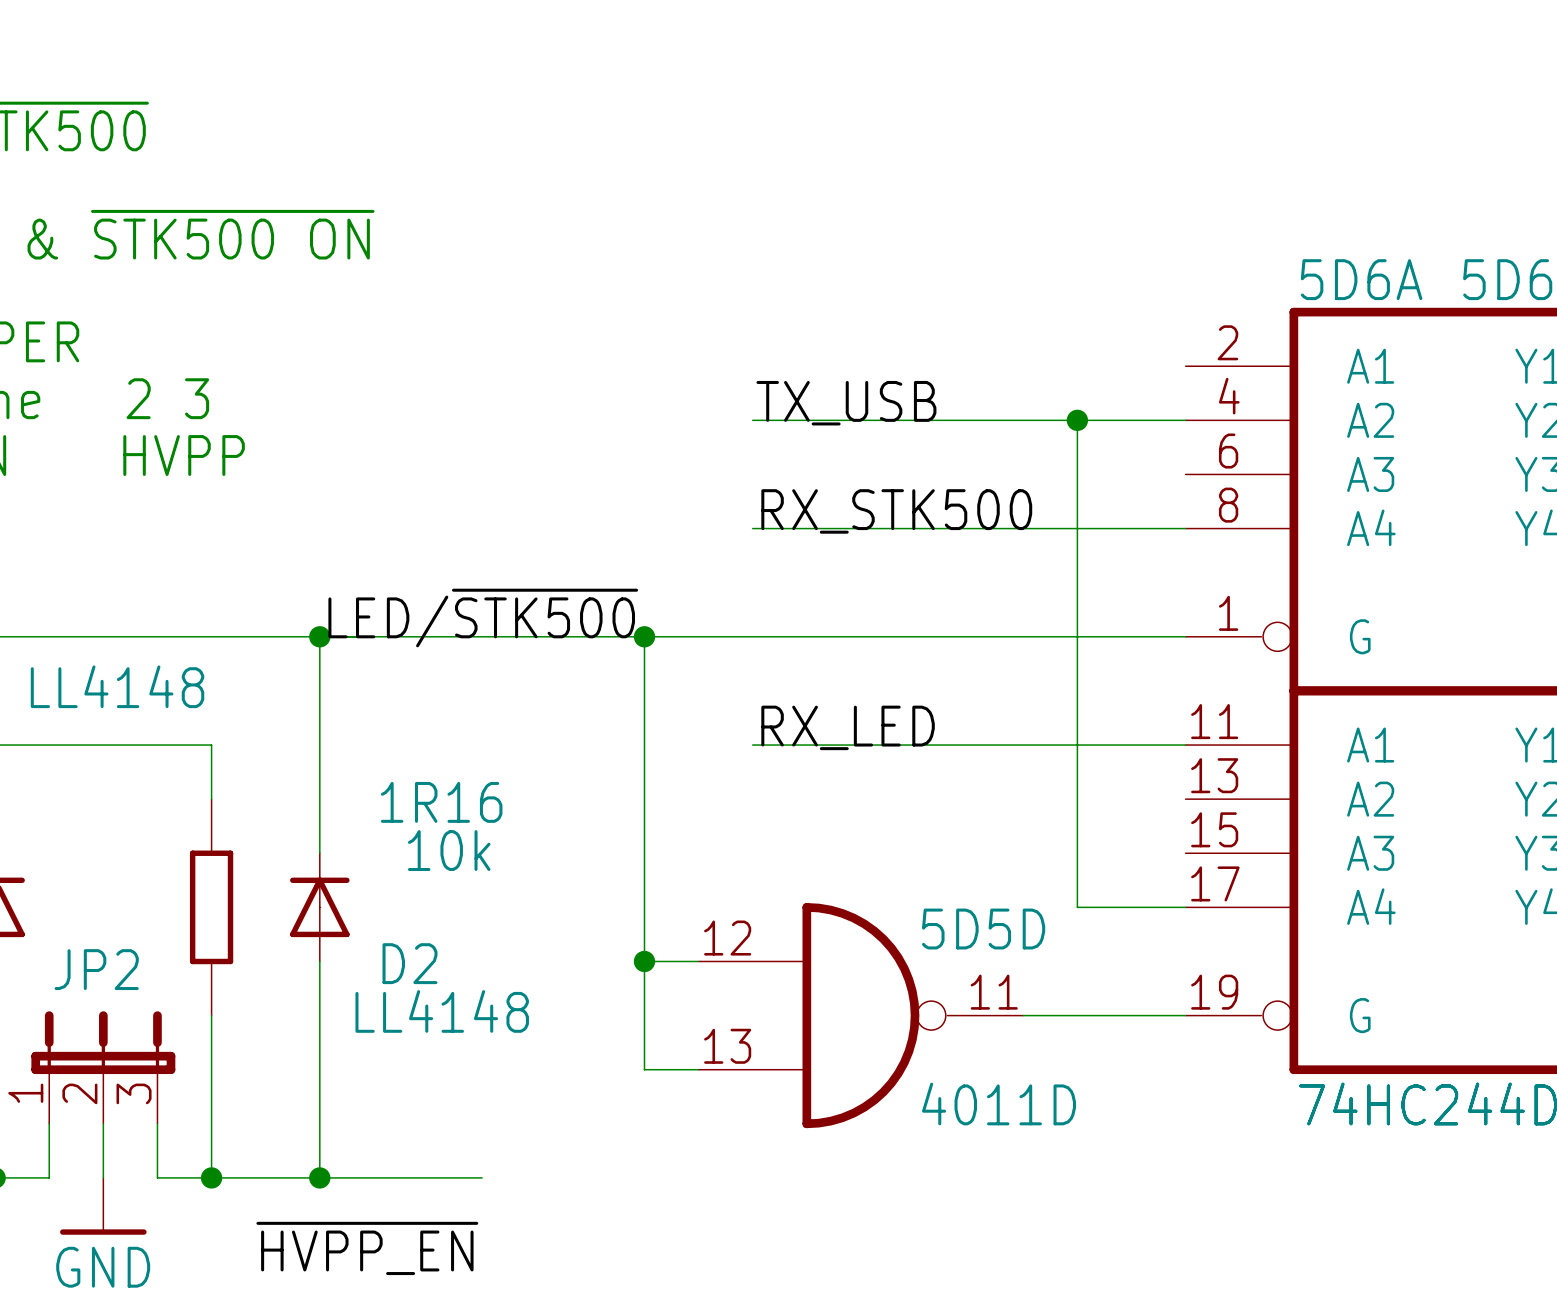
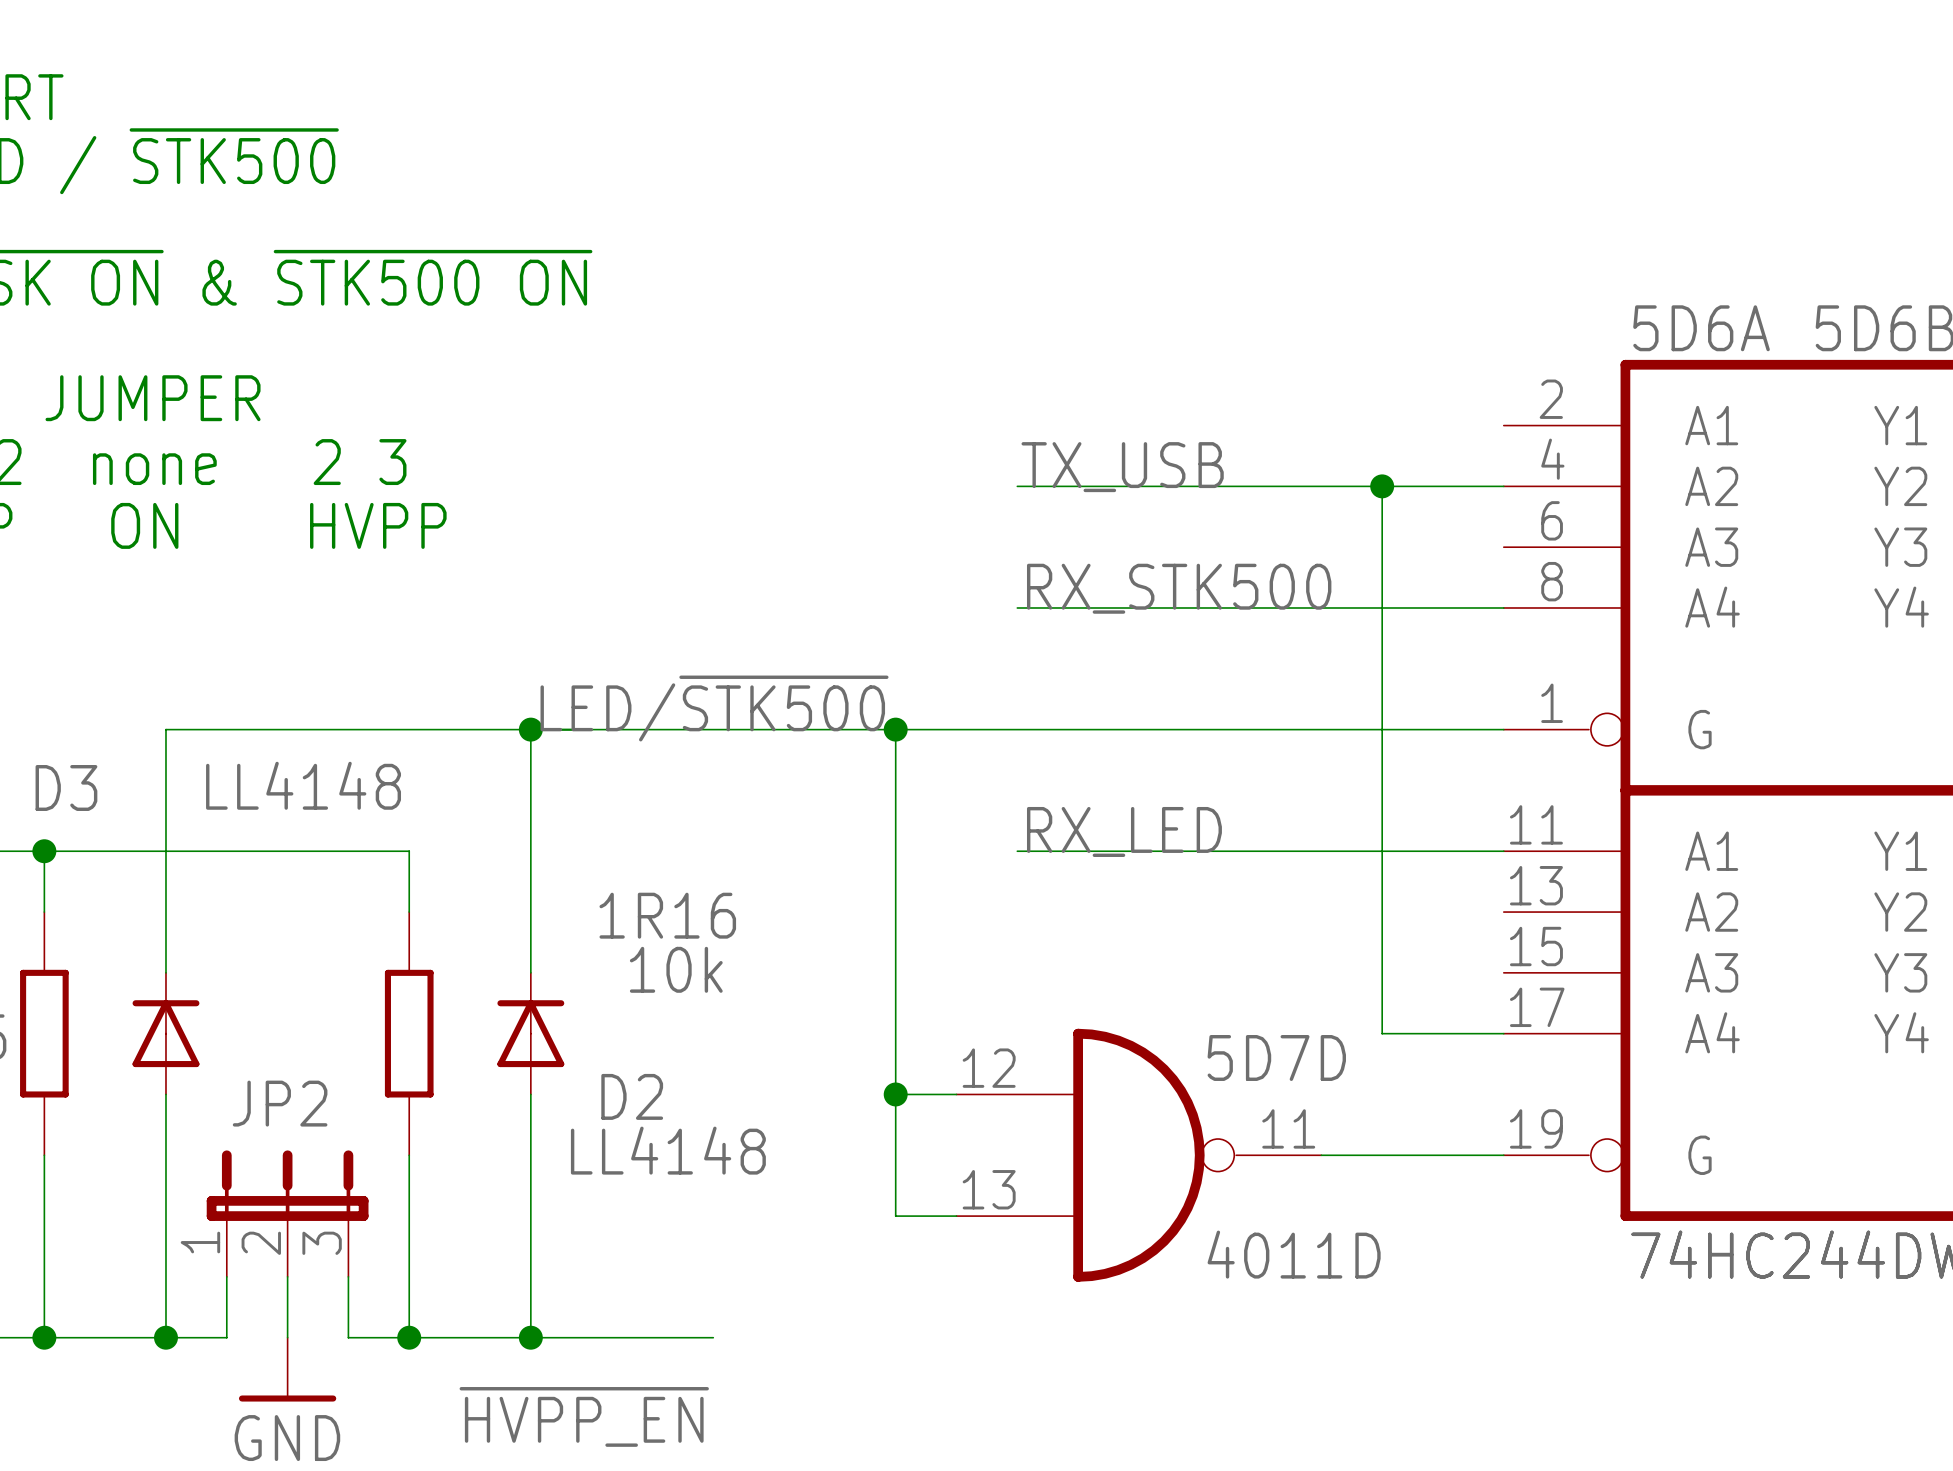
5D5D name: 5D5D (983, 929) -> 5D7D (1276, 1057)

